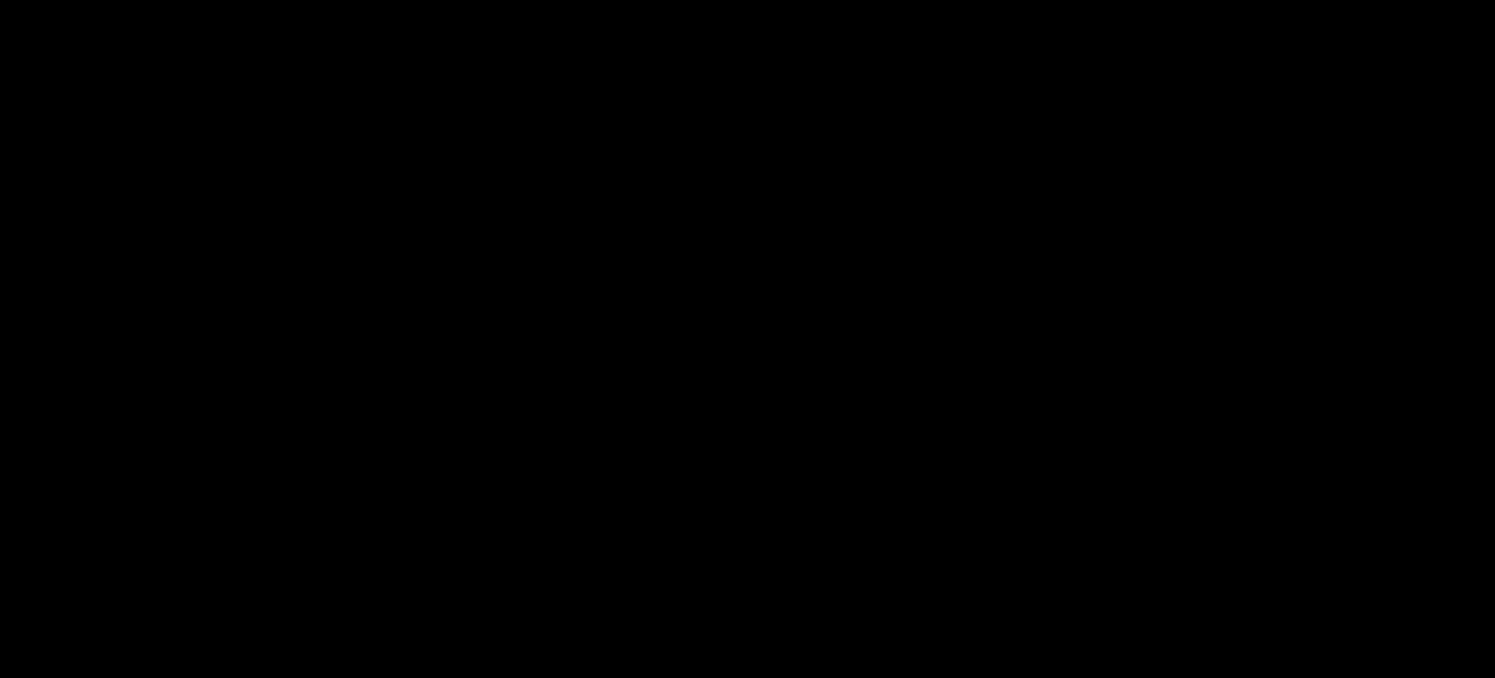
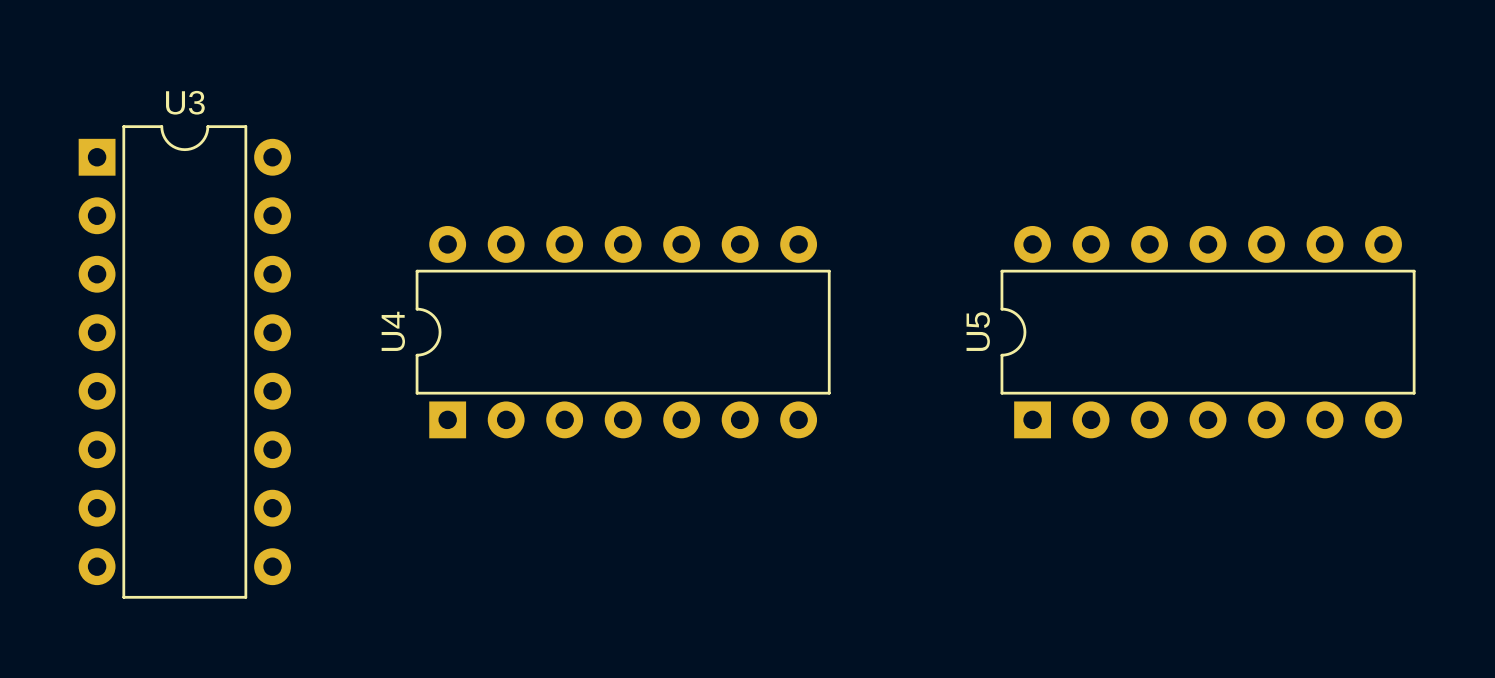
U4: none -> (623, 332)
U5: none -> (1208, 332)
U3: none -> (184, 361)

